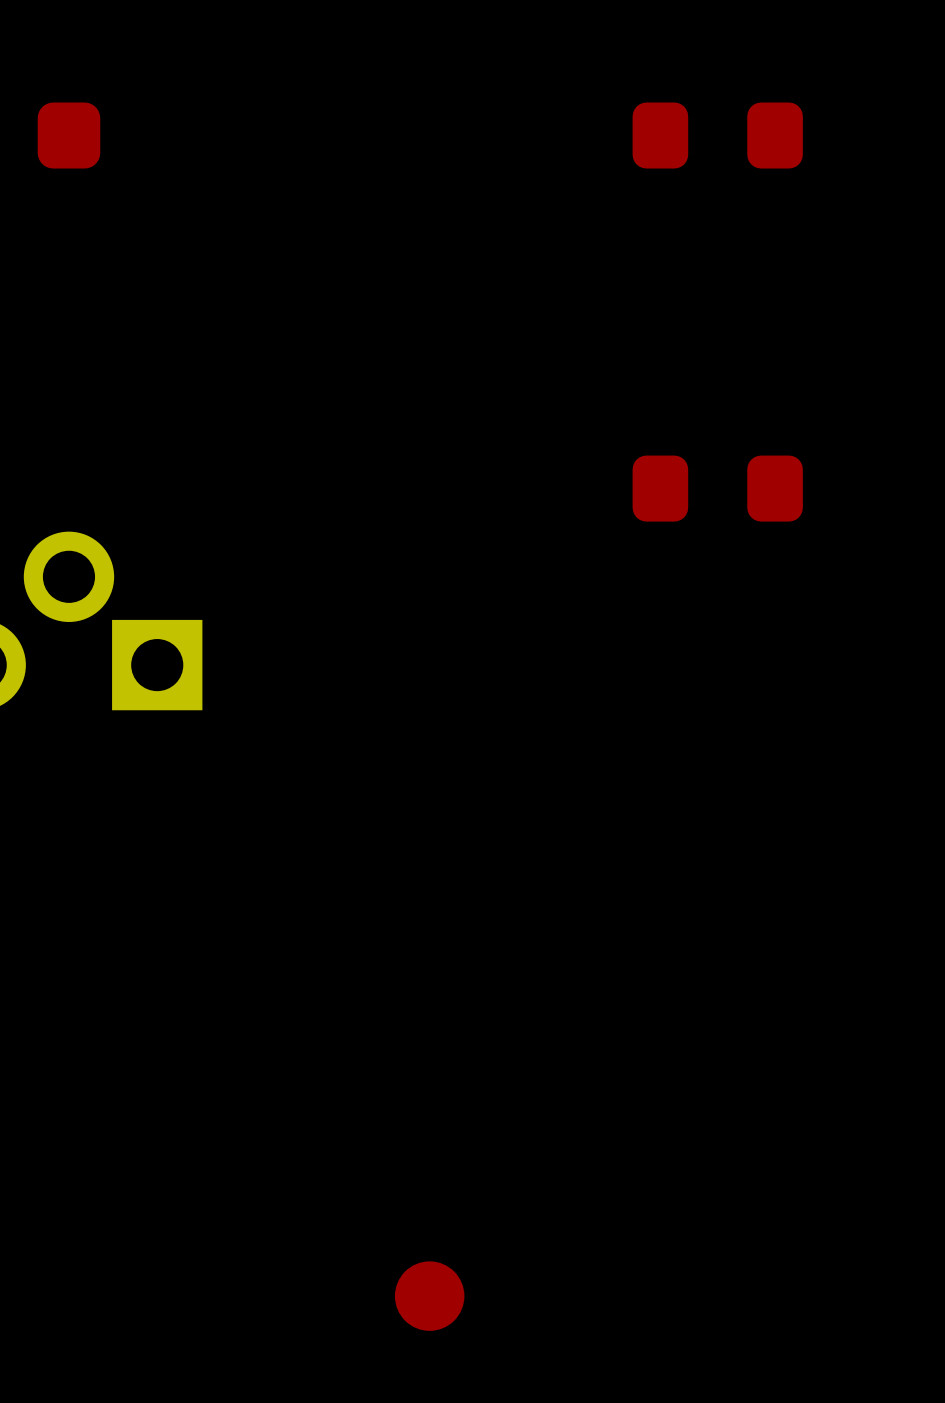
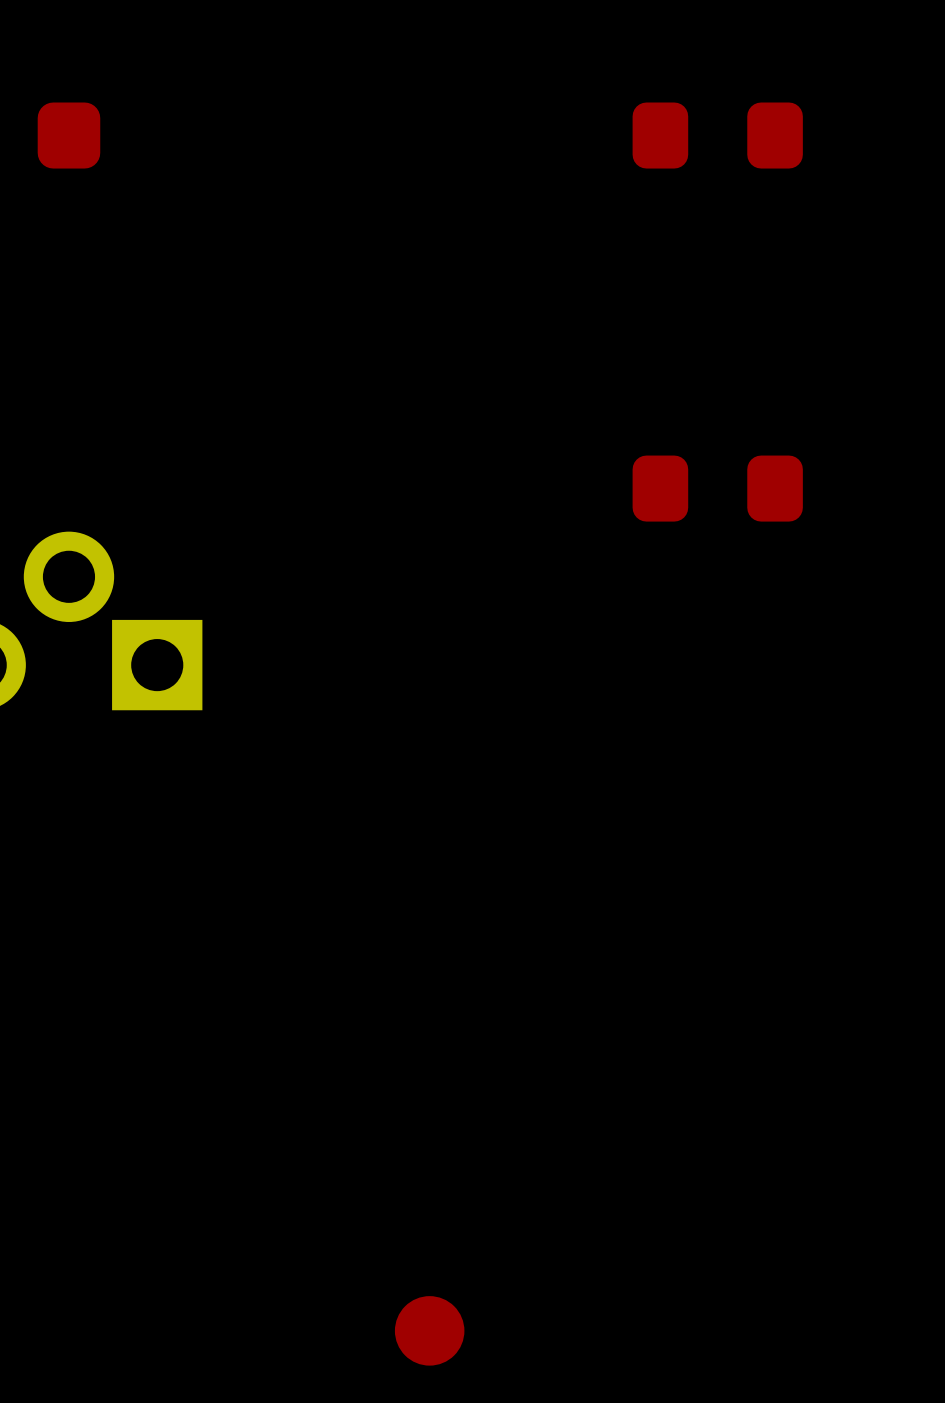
part position: (429, 1296) -> (429, 1330)

